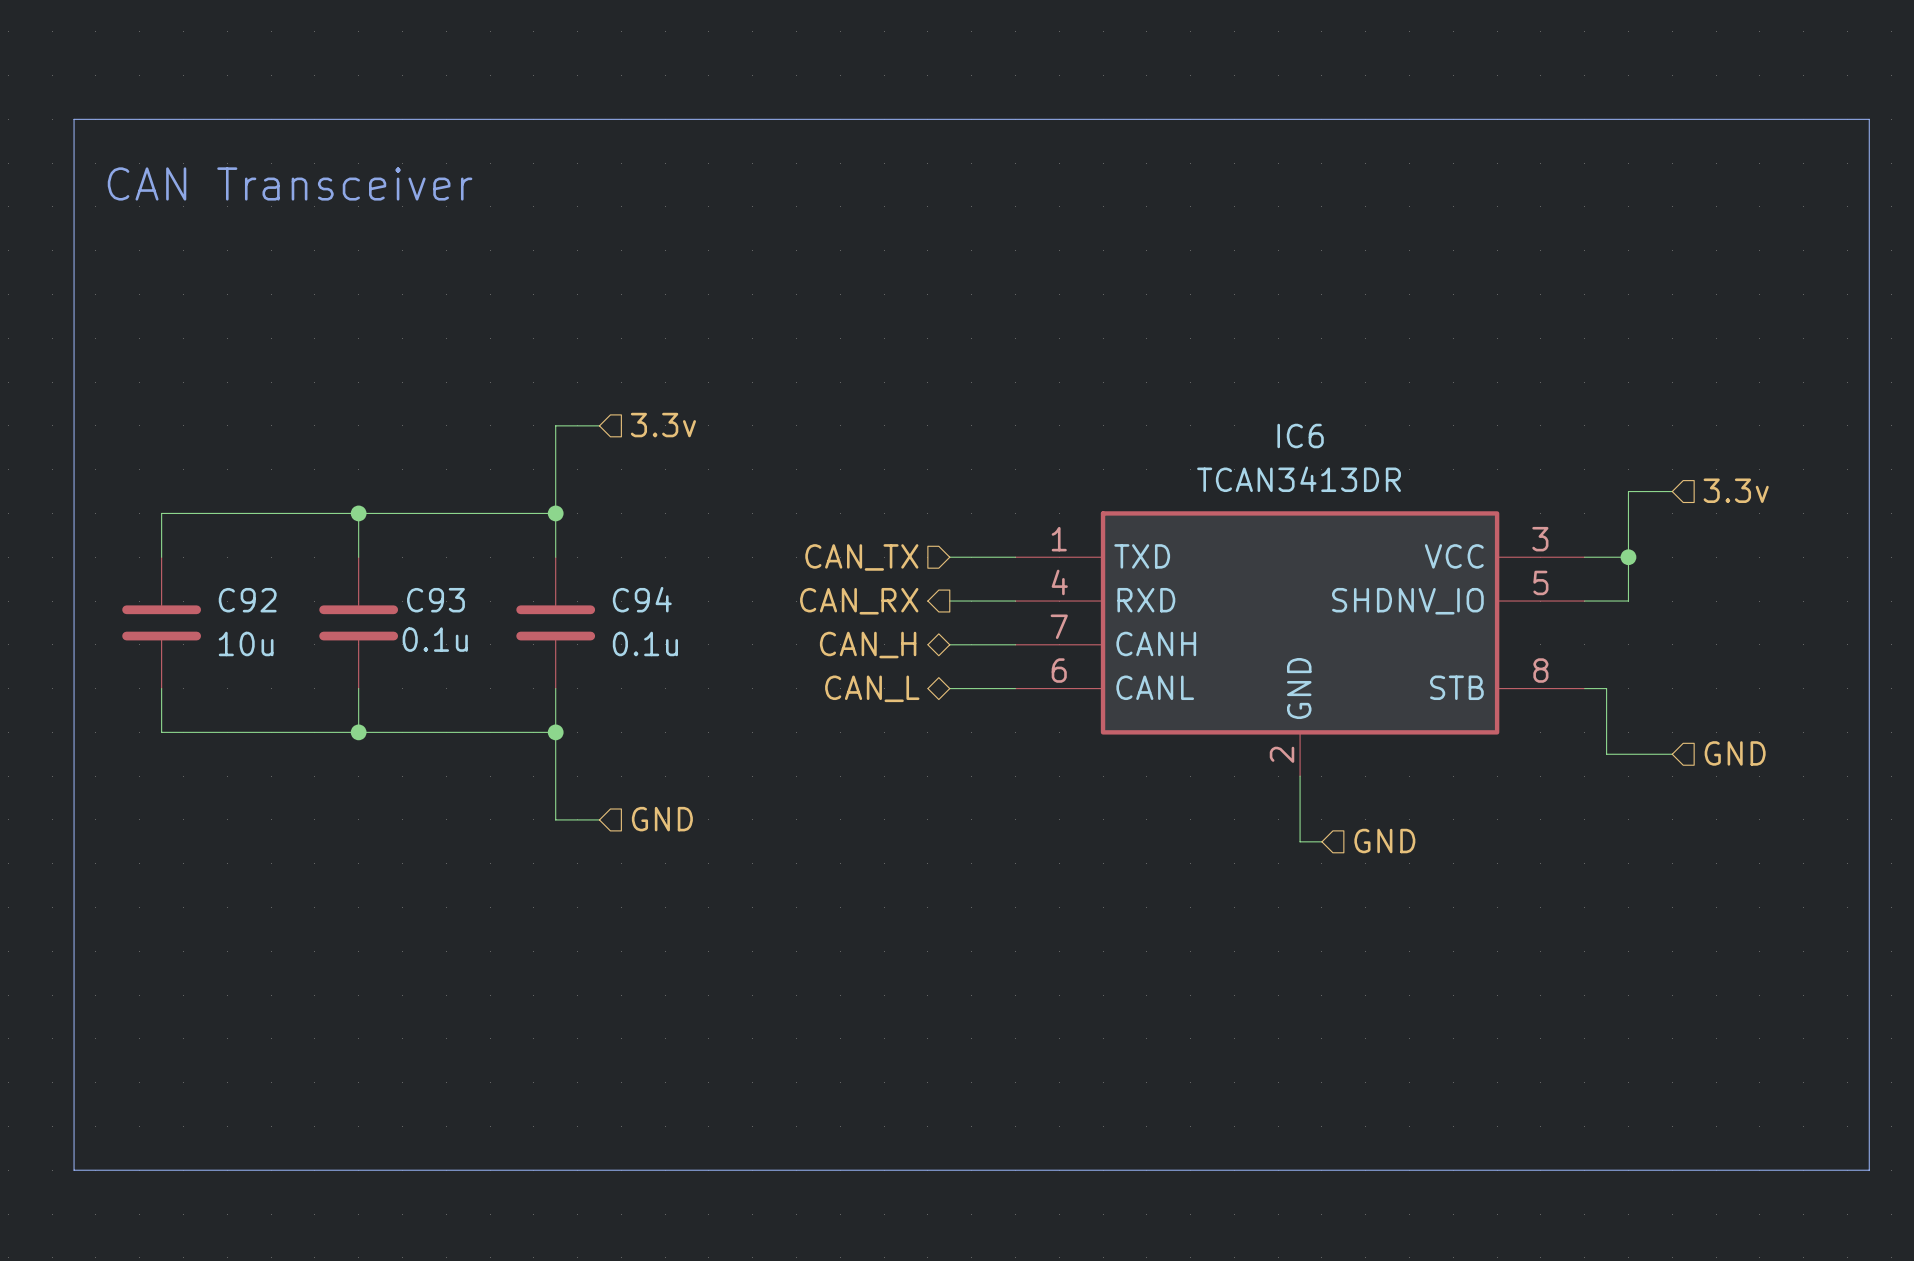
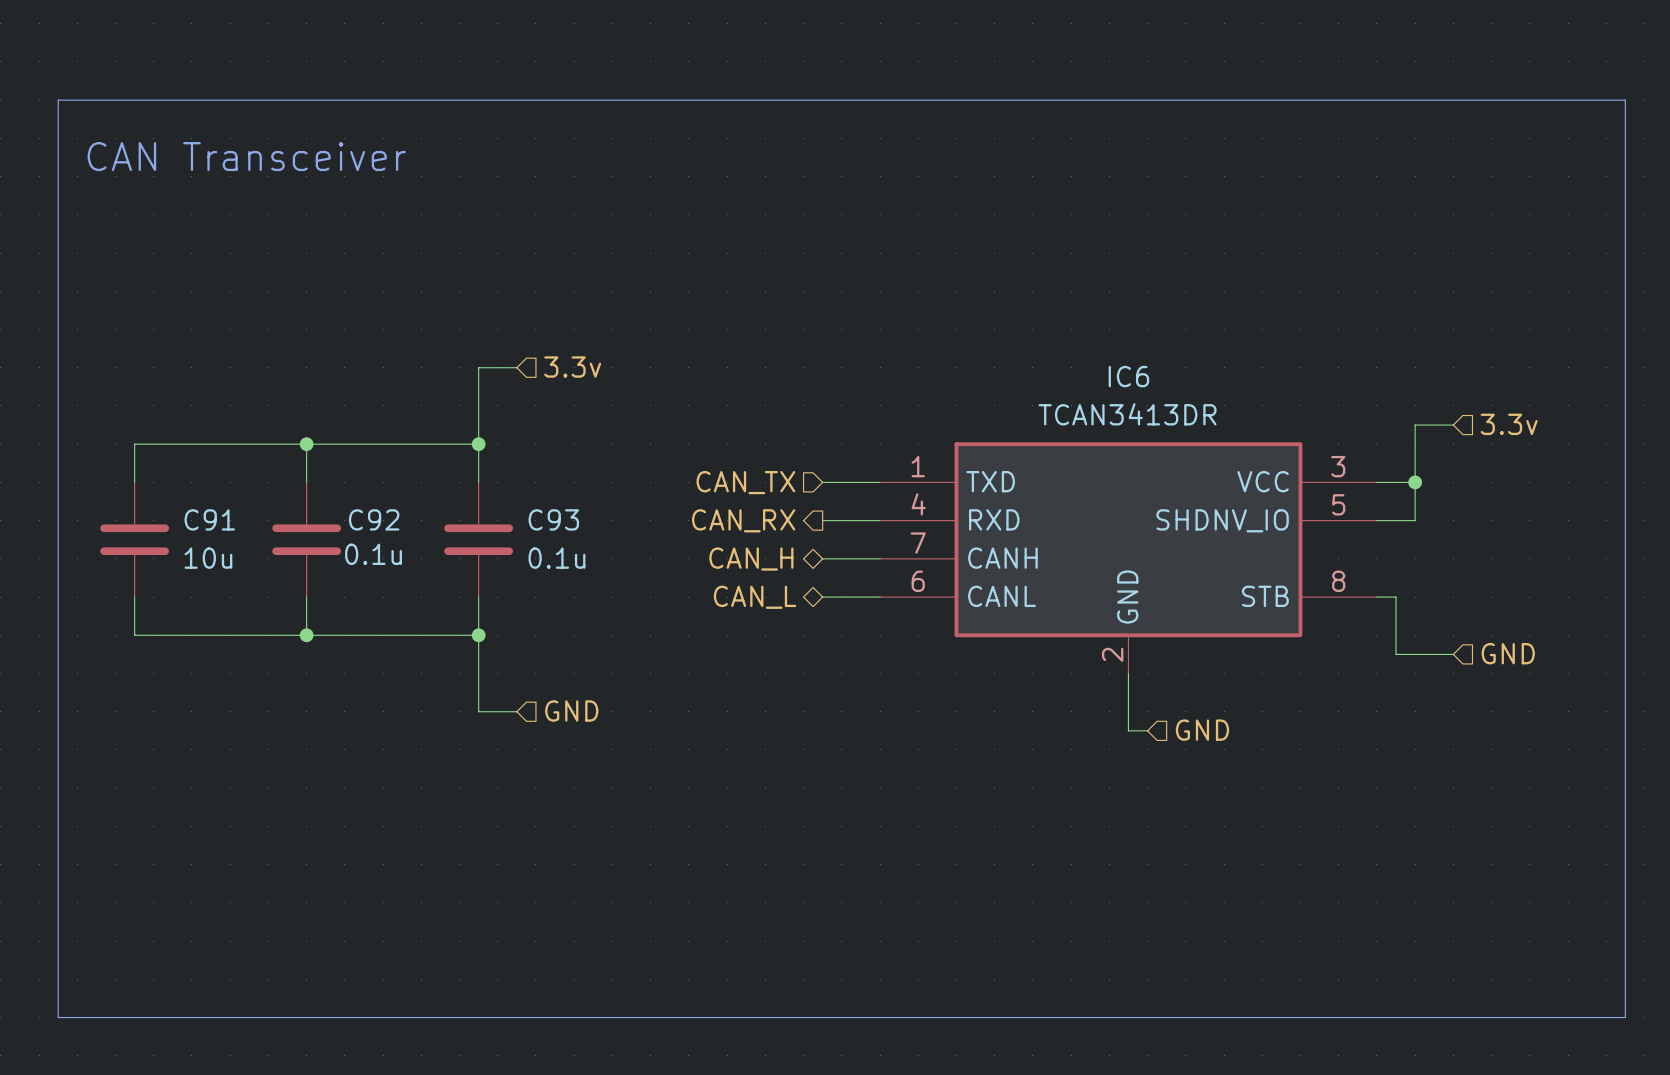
C94 name: C94 (642, 599) -> C93 (553, 519)
C92 name: C92 (247, 600) -> C91 (209, 519)
C93 name: C93 (435, 600) -> C92 (374, 519)

